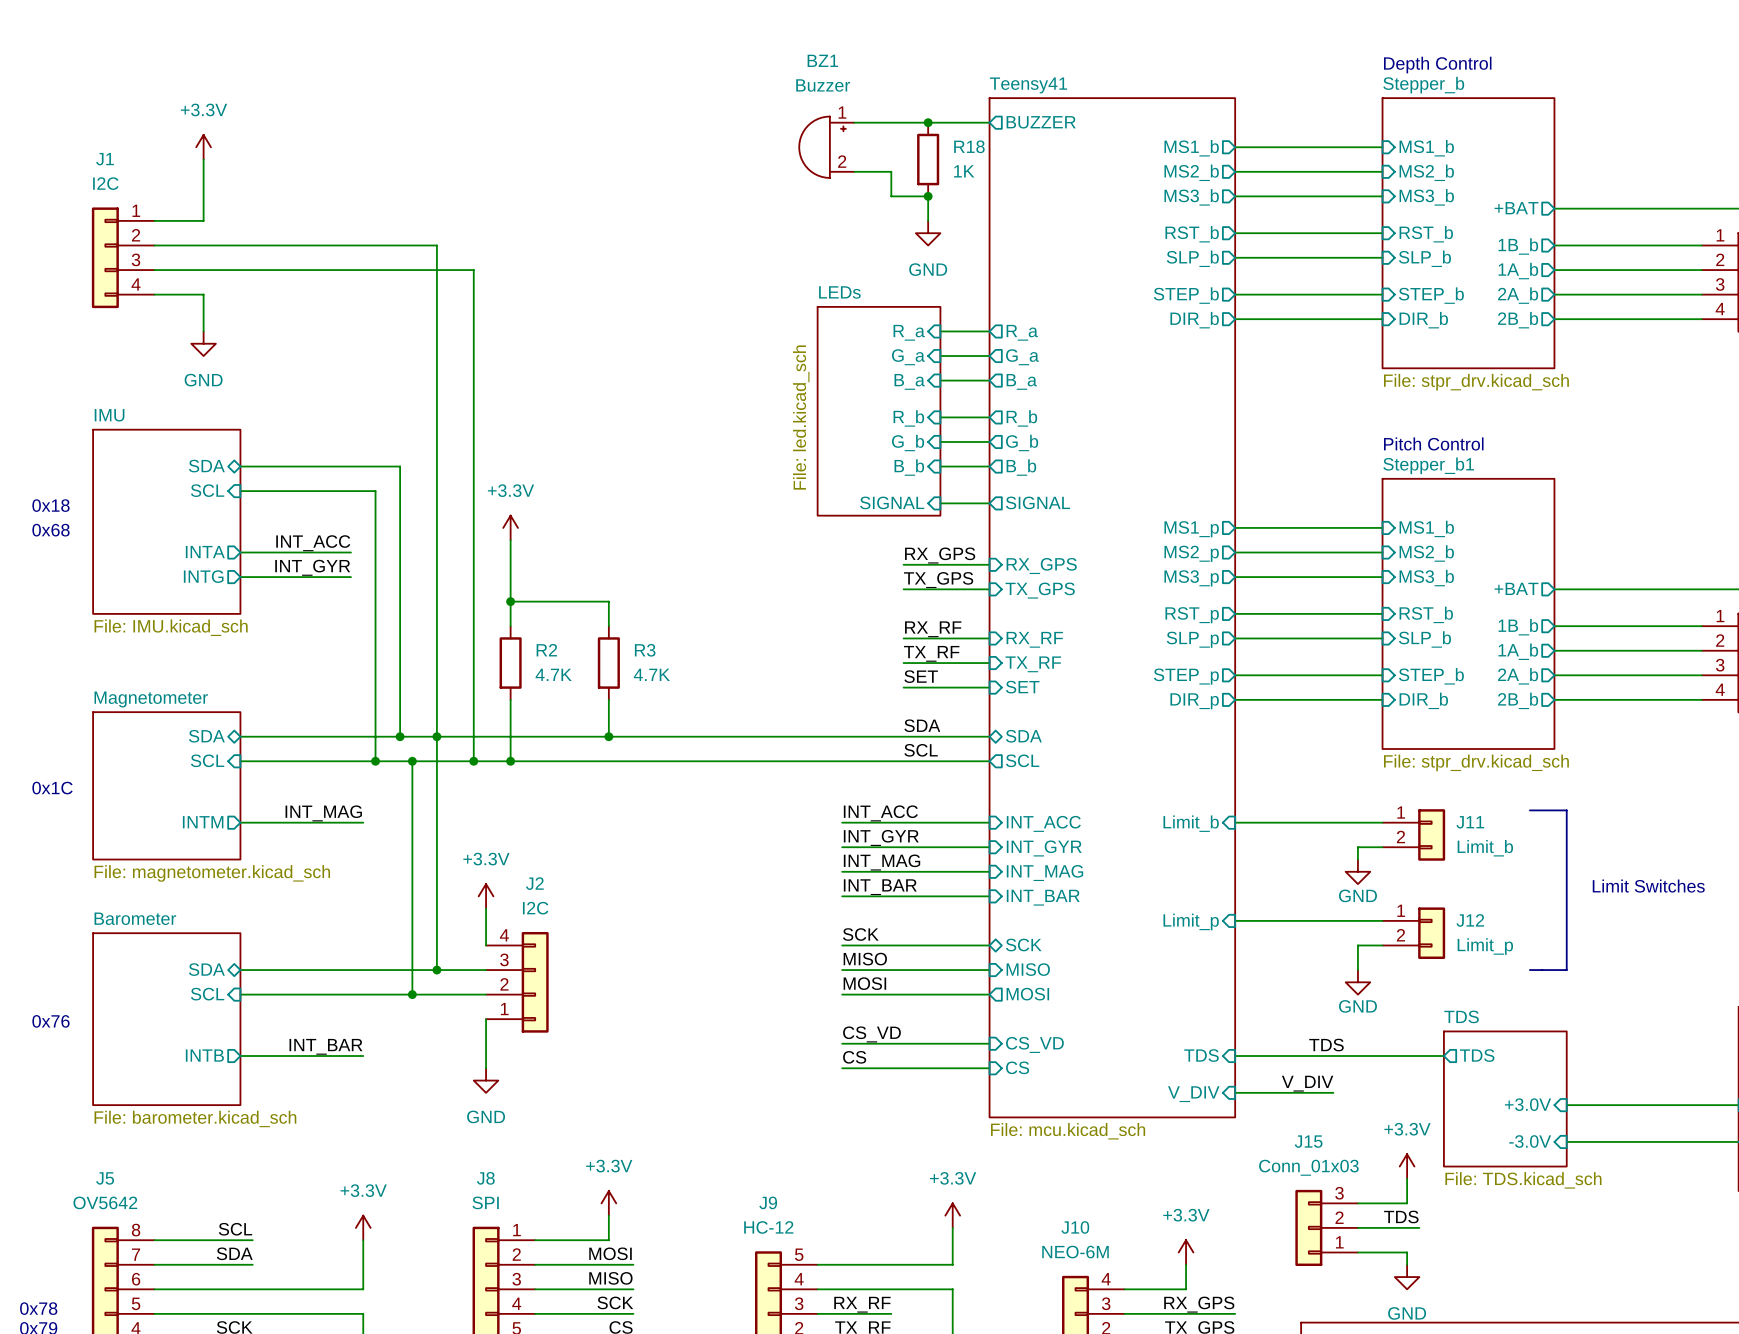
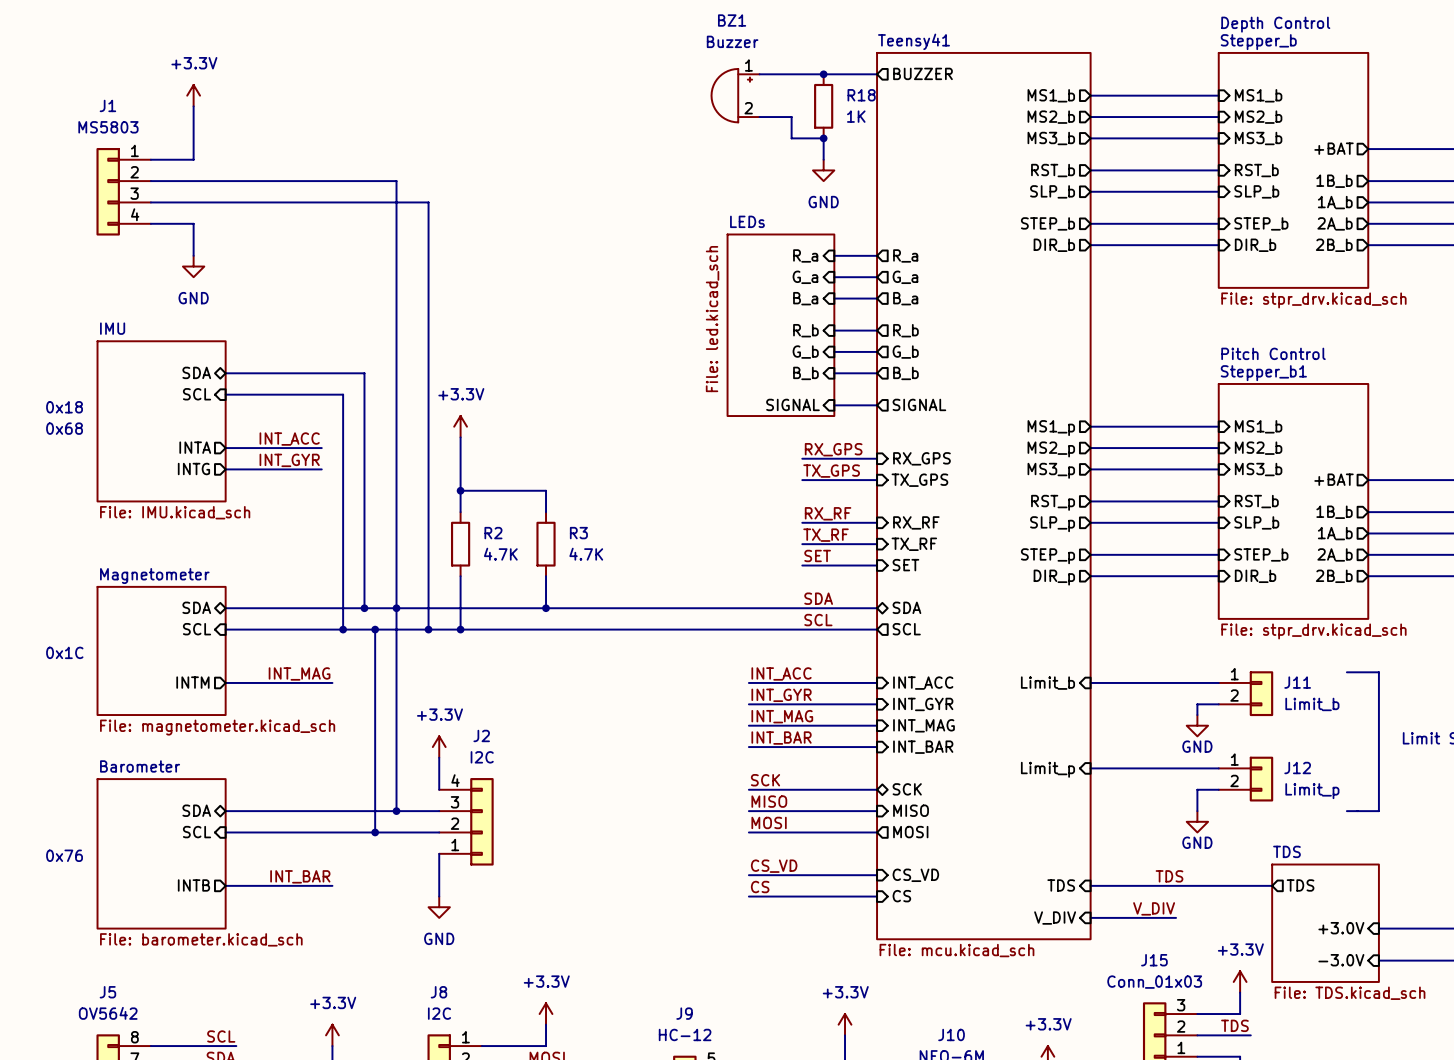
J1 value: I2C (105, 183) -> MS5803 (108, 127)
J8 value: SPI (485, 1202) -> I2C (439, 1013)

